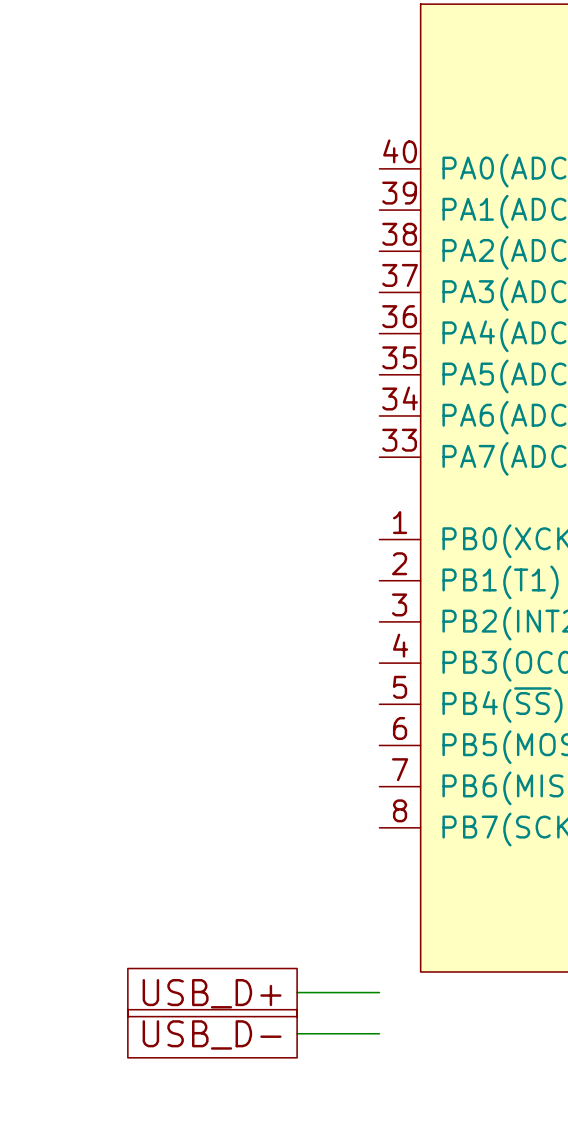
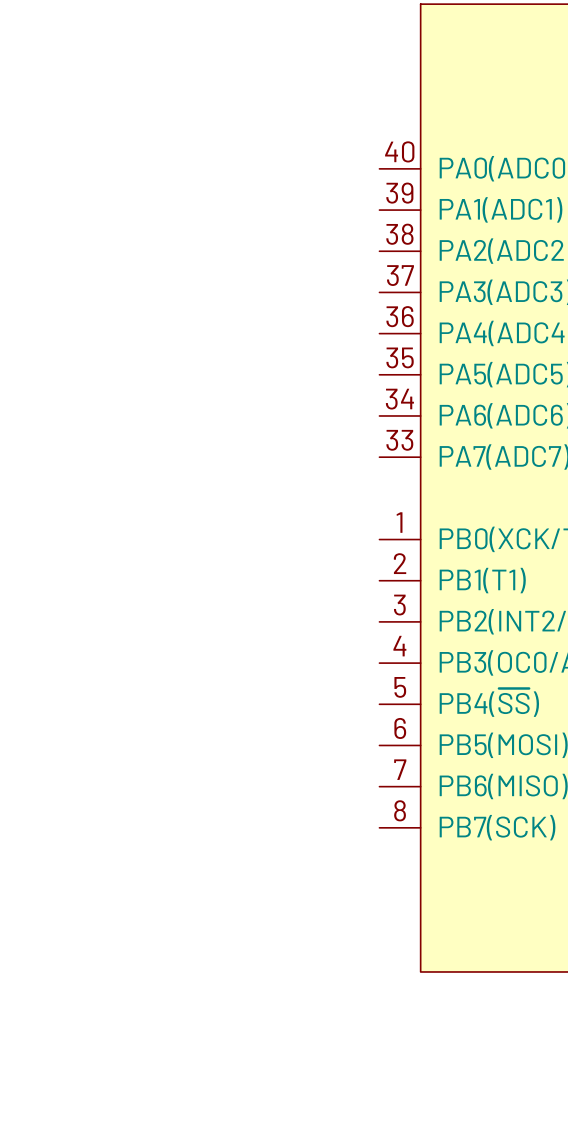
wire: (297, 992) (379, 992) -> none
global label: USB_D+ (212, 993) -> none
wire: (297, 1033) (379, 1033) -> none
global label: USB_D- (212, 1034) -> none

